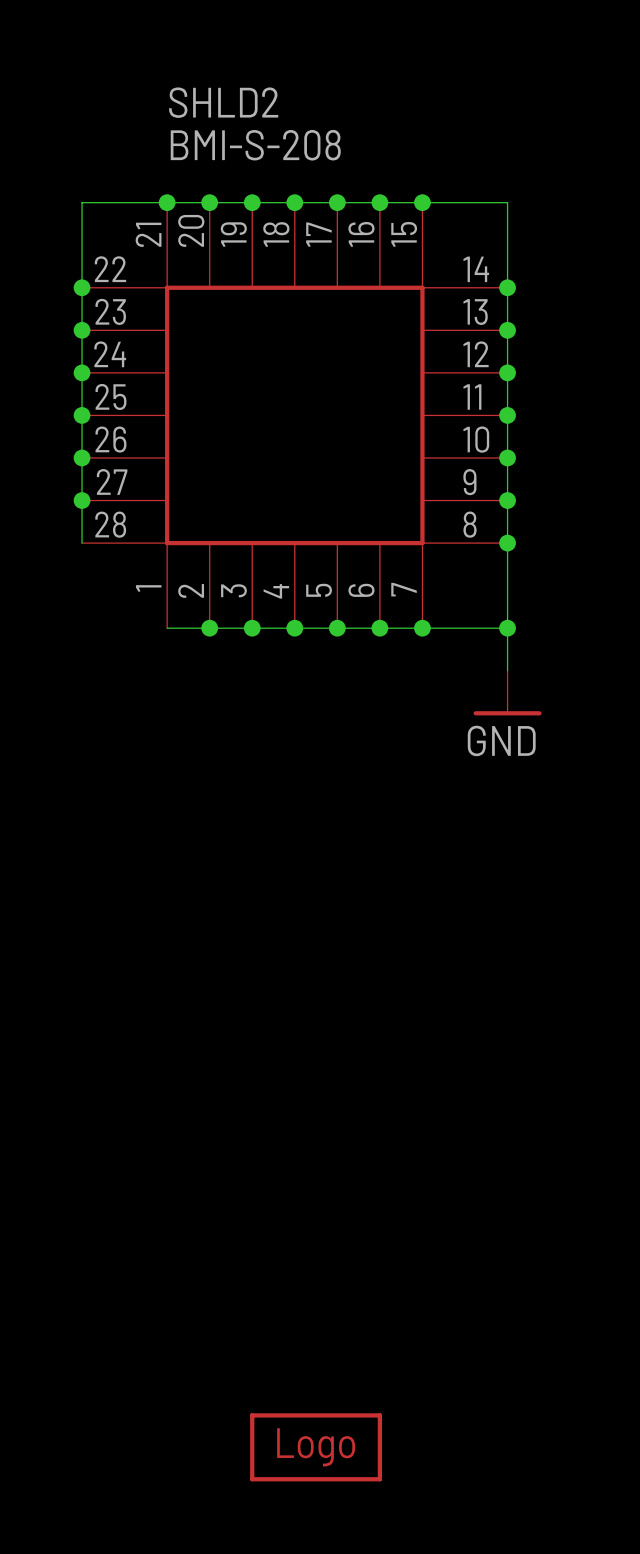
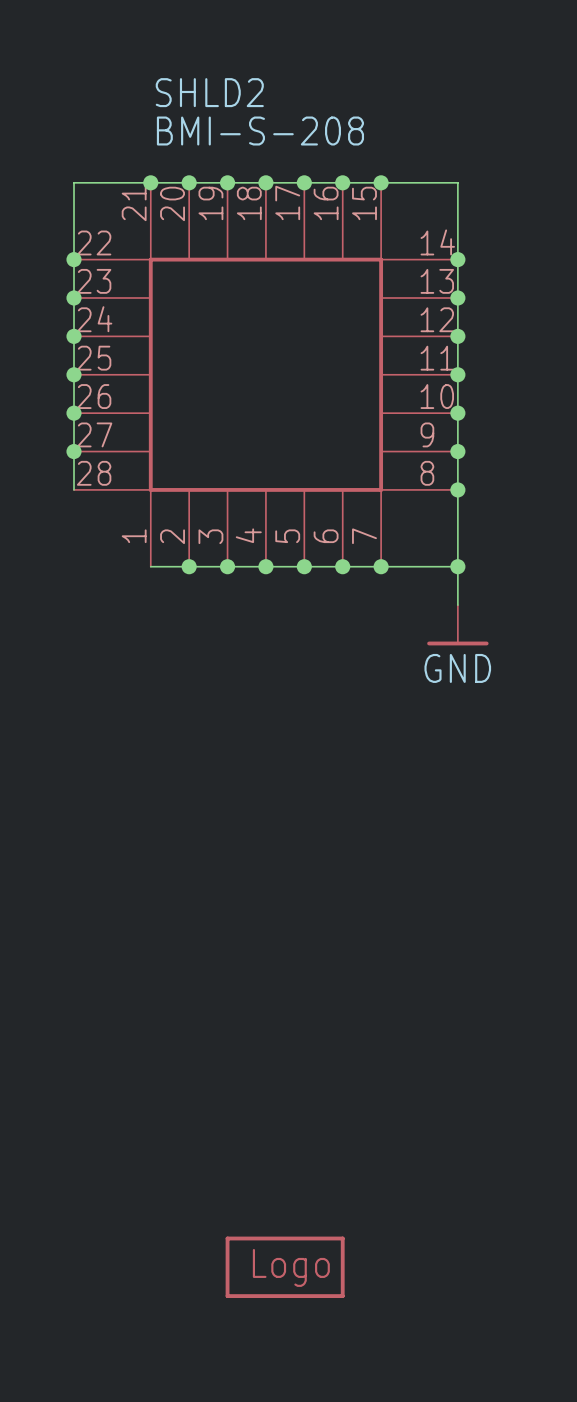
part position: (316, 1447) -> (285, 1267)

